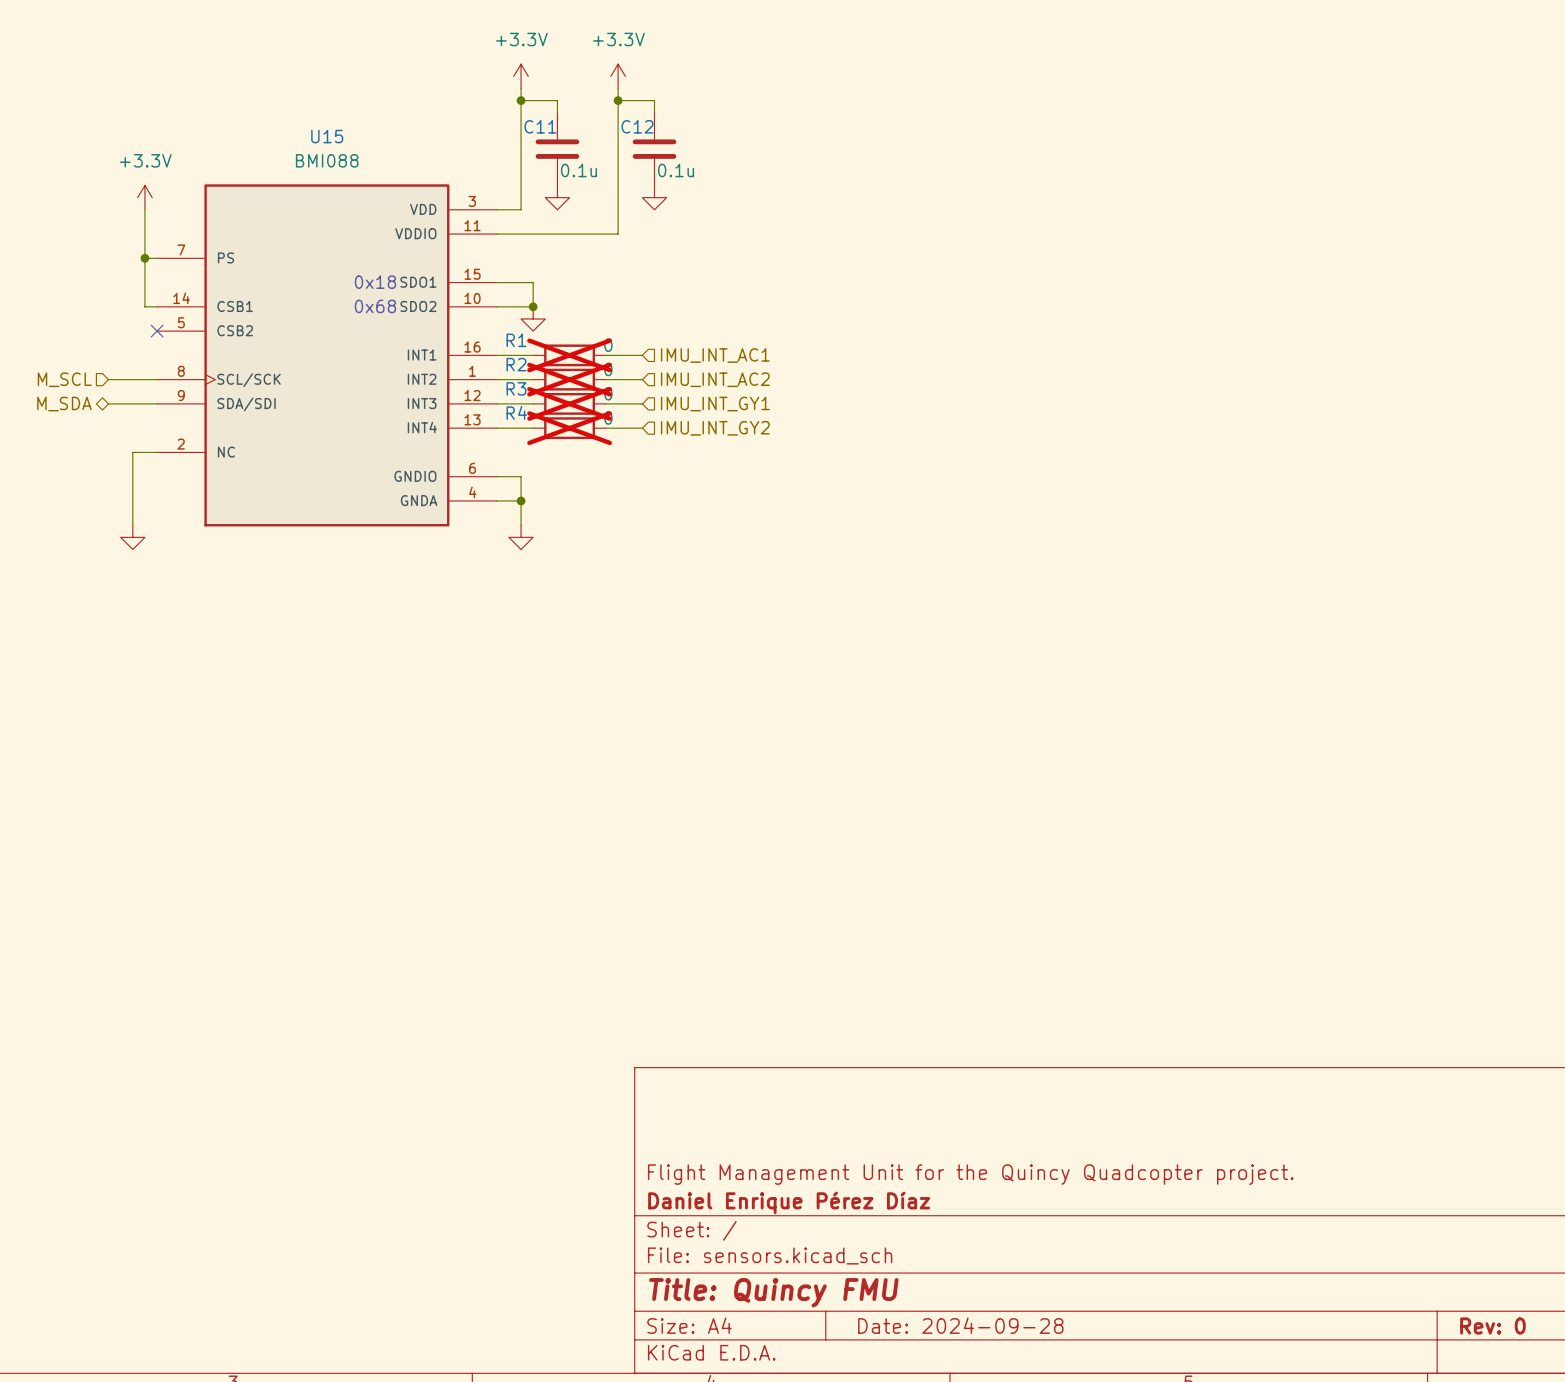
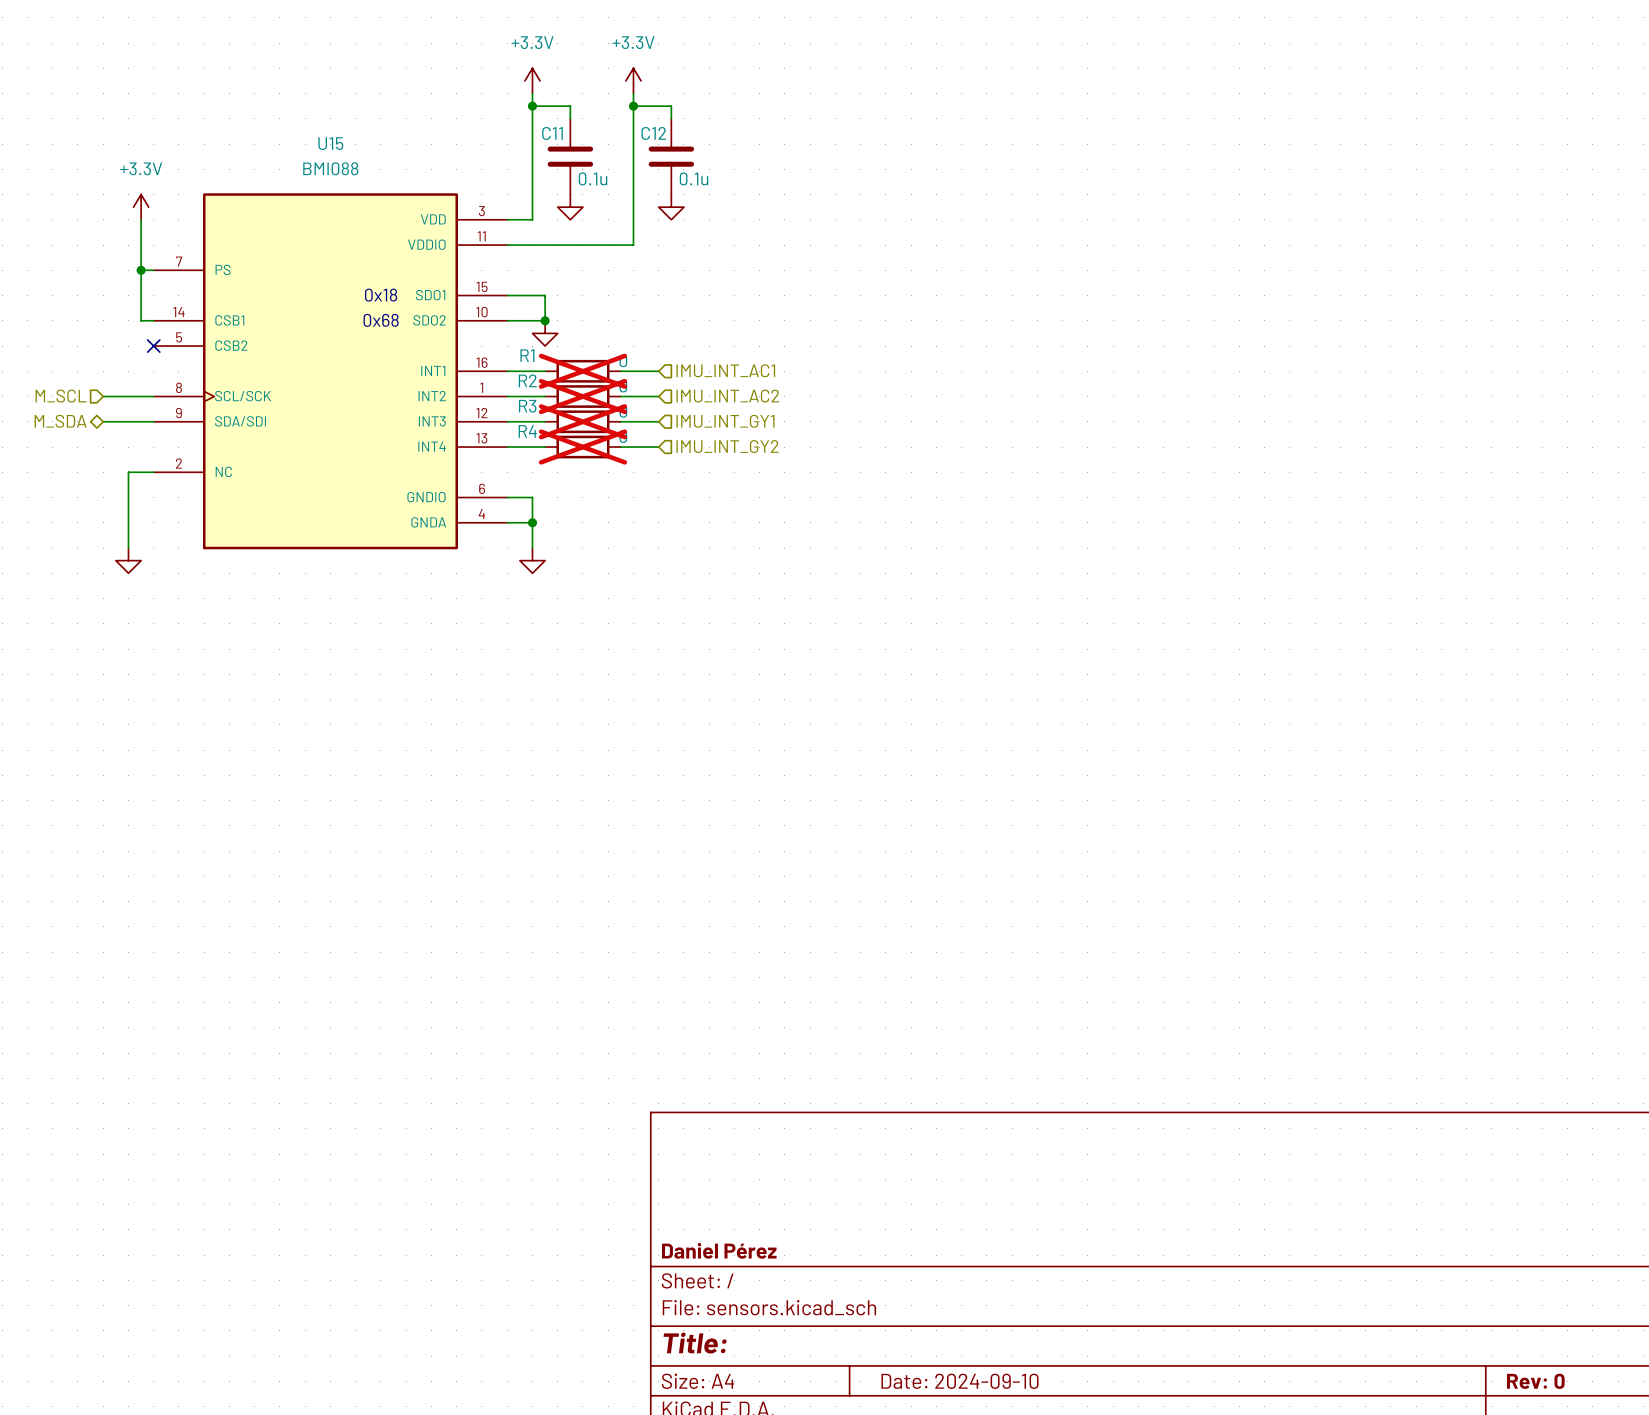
title block: Flight Management Unit for the Quincy Quadcopter project. (970, 1174) -> none
title block: Daniel Enrique Pérez Díaz (789, 1202) -> Daniel Pérez (719, 1250)
title block: Title: Quincy FMU (773, 1292) -> Title: (695, 1343)
title block: Date: 2024-09-28 (960, 1325) -> Date: 2024-09-10 (959, 1381)

